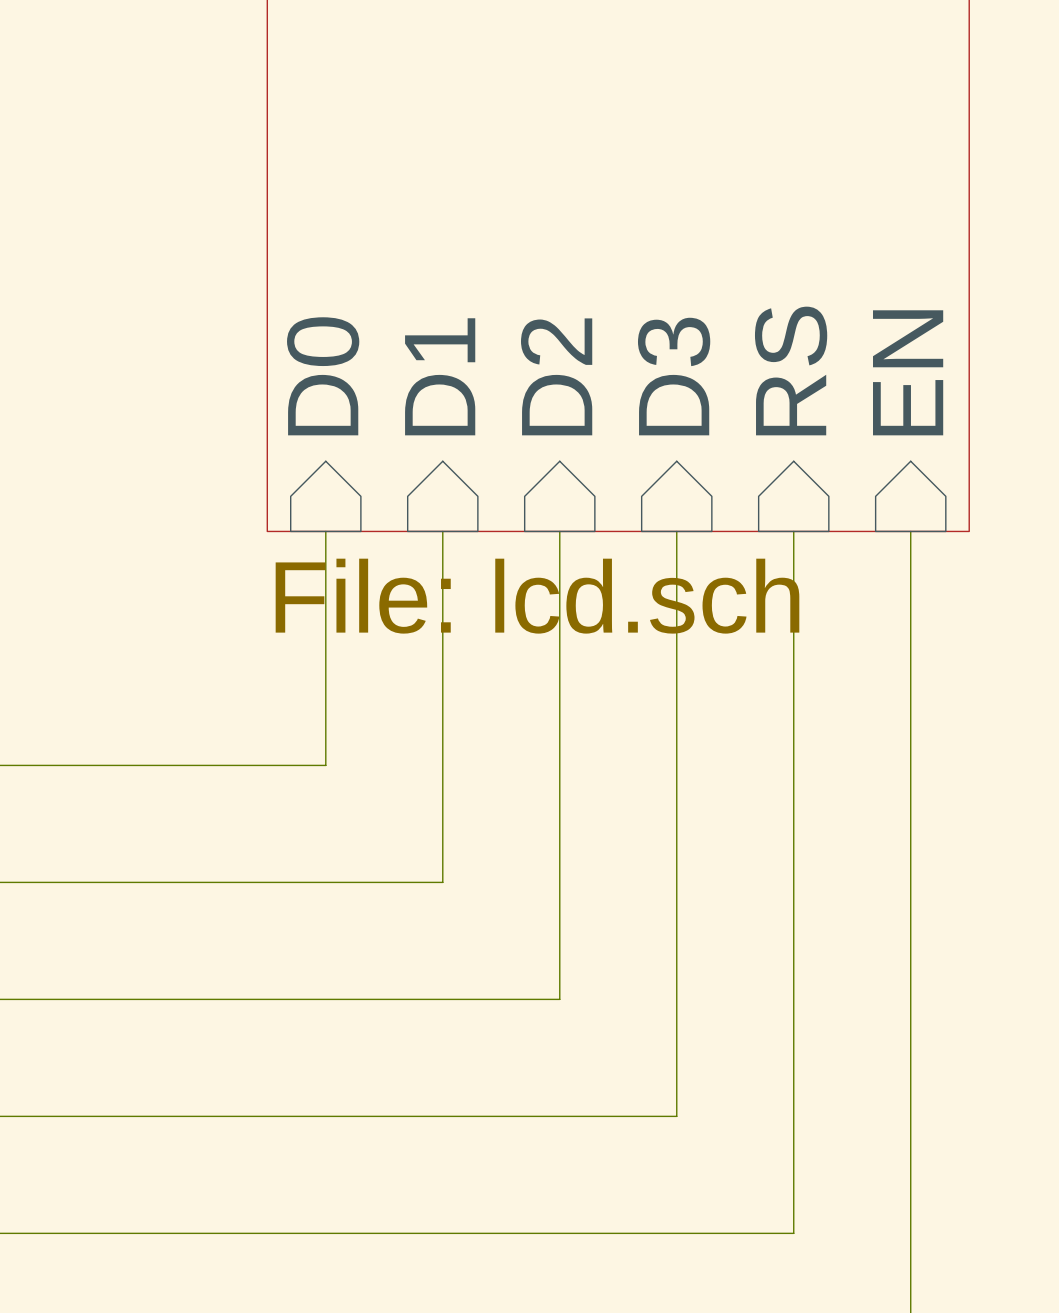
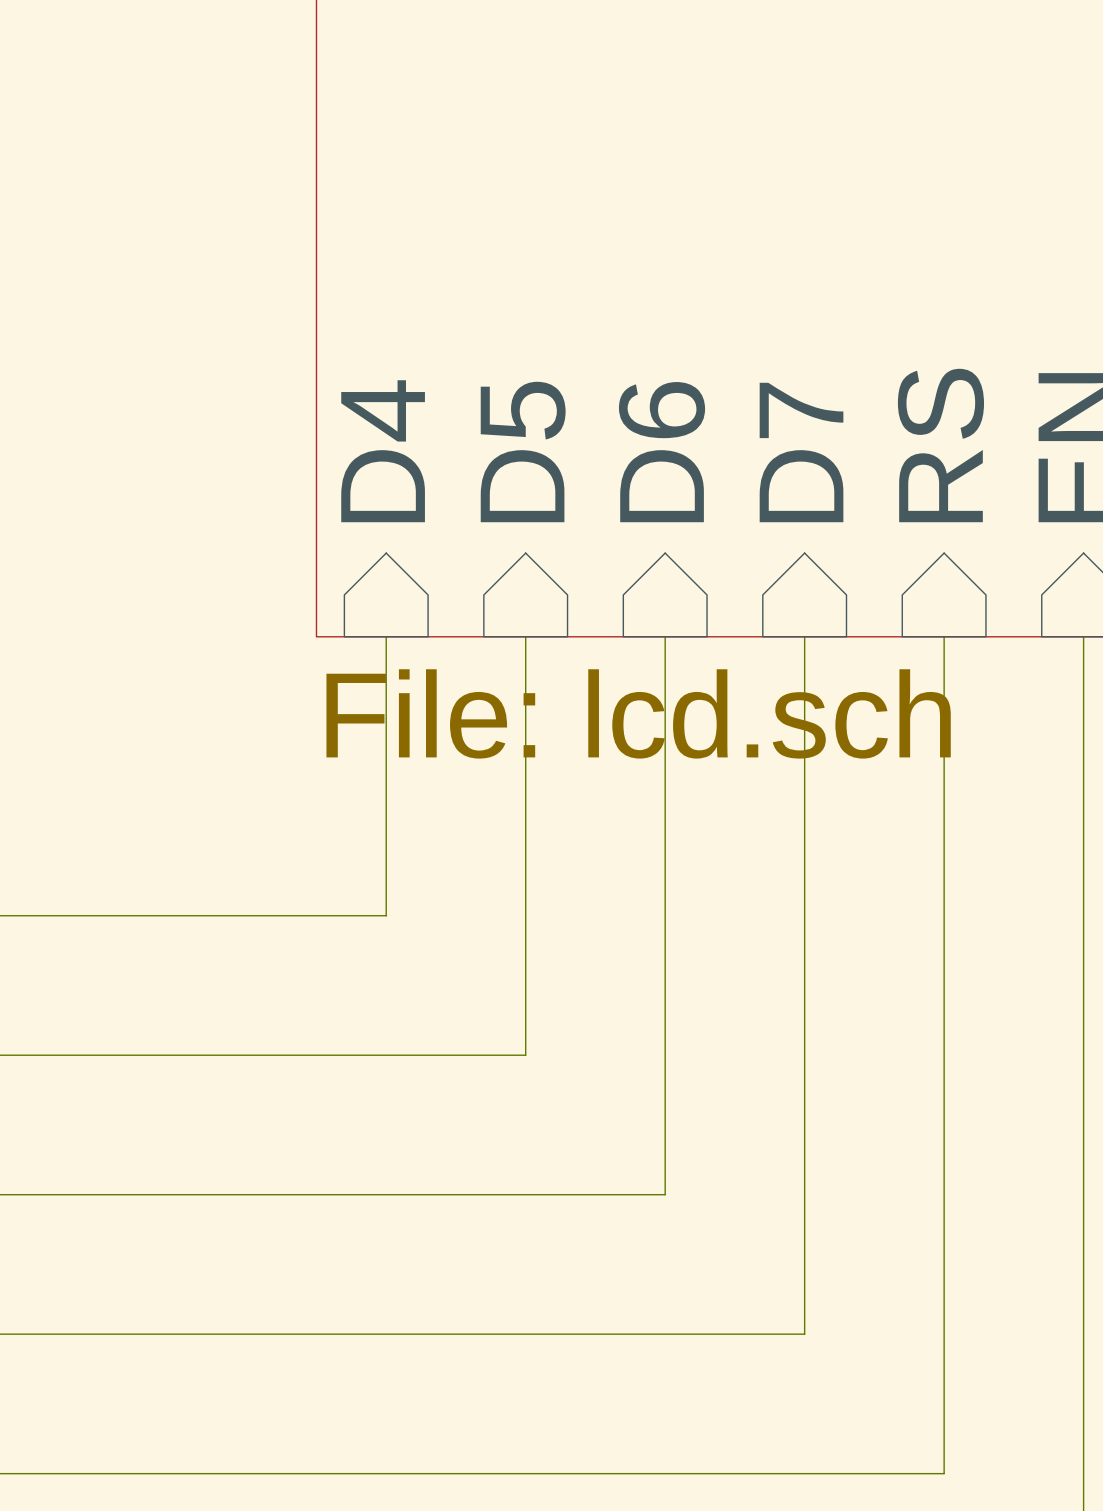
sheet pin: D0 (323, 376) -> D4 (383, 451)
sheet pin: D1 (440, 376) -> D5 (523, 452)
sheet pin: D2 (556, 376) -> D6 (662, 452)
sheet pin: D3 (674, 376) -> D7 (801, 452)

